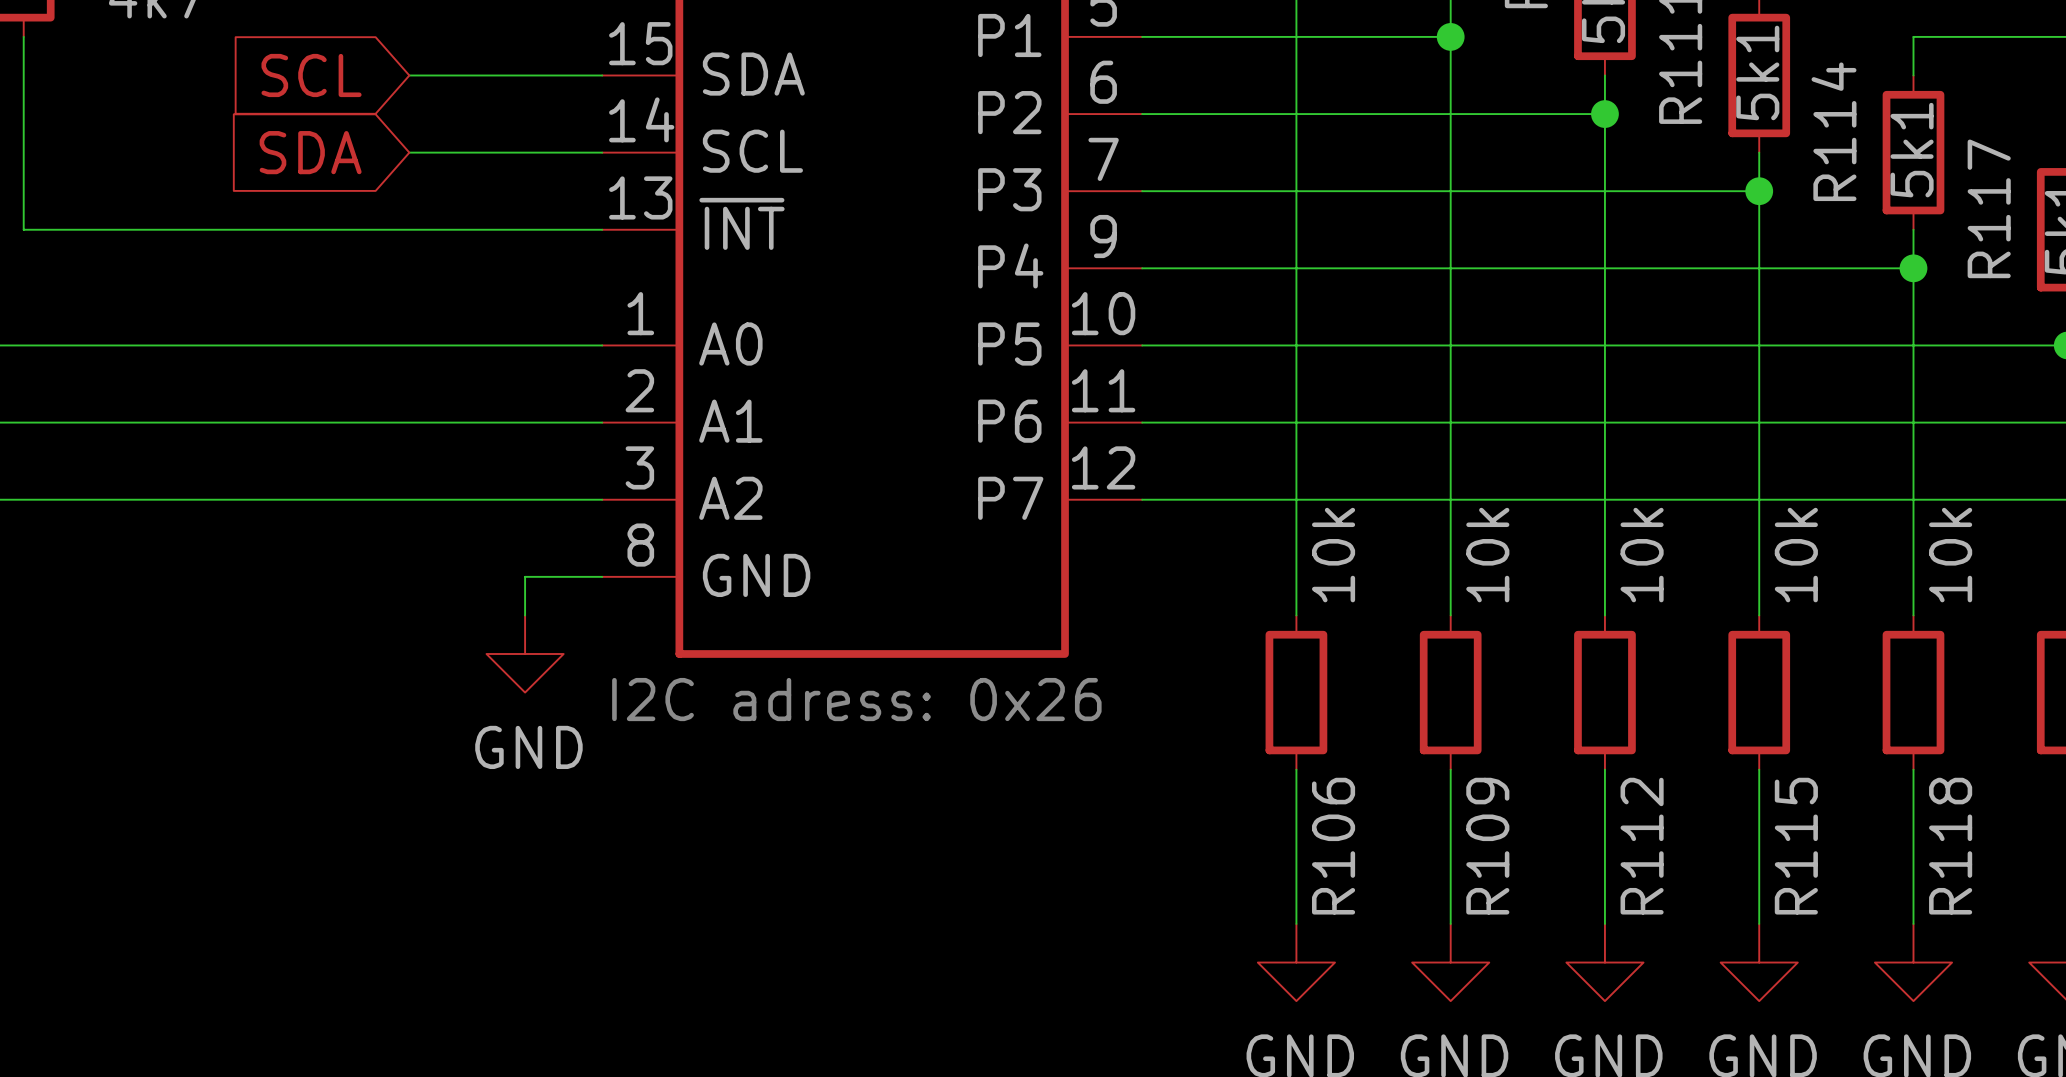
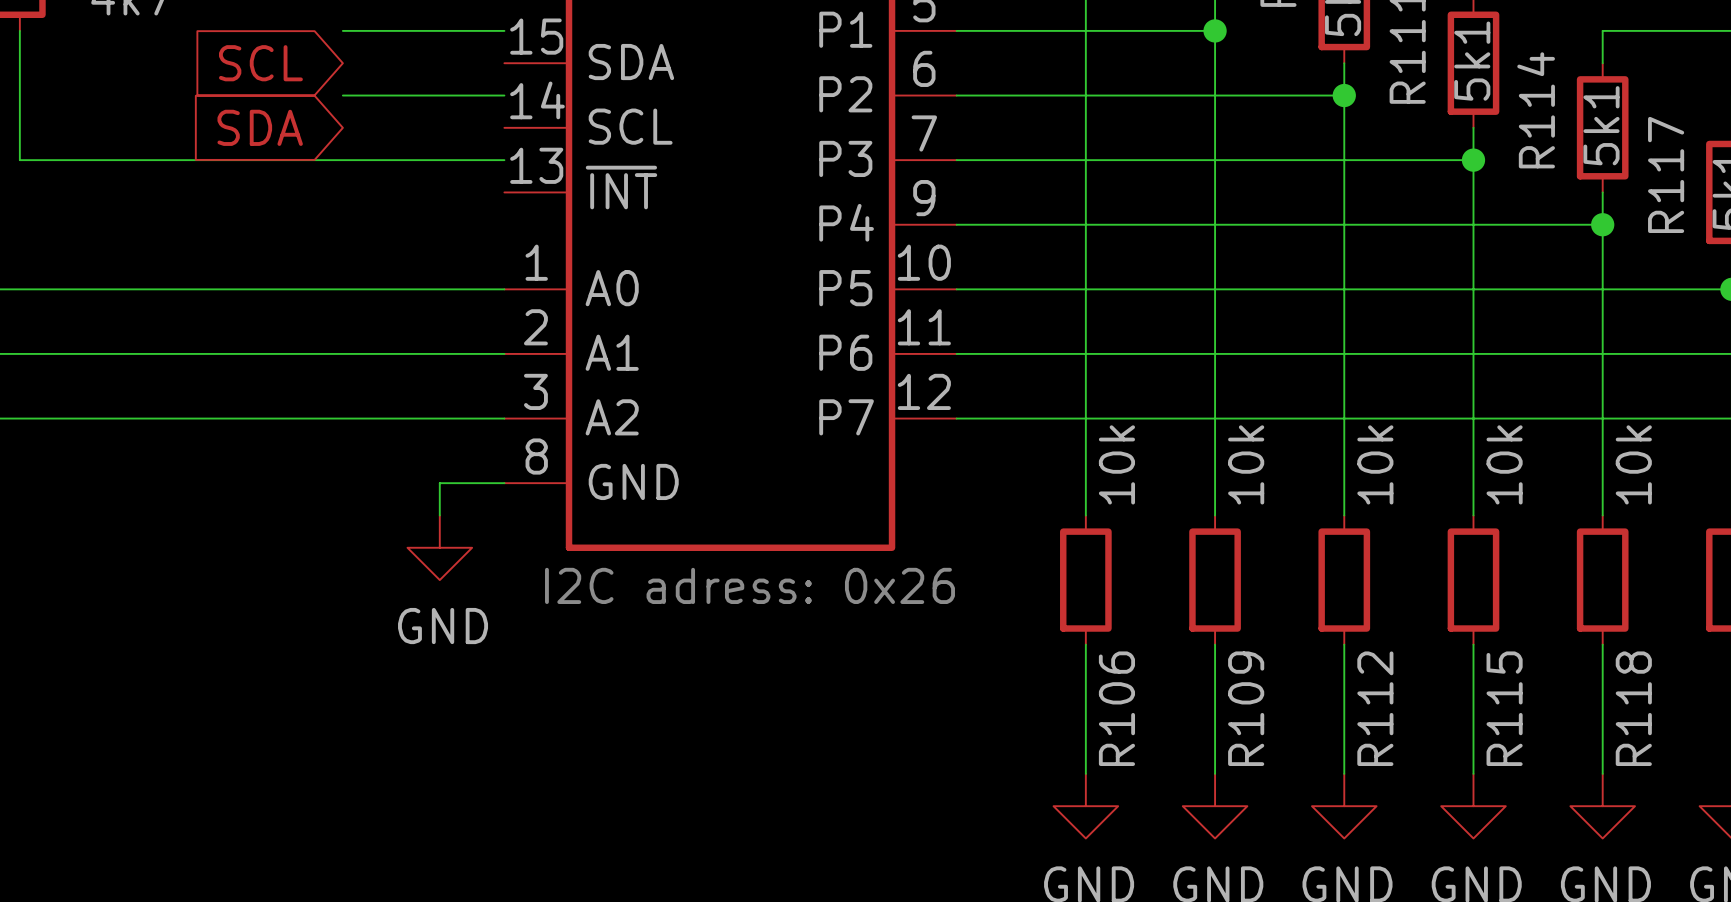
wire: (409, 75) (602, 75) -> (342, 30) (504, 30)
wire: (409, 152) (602, 152) -> (342, 95) (504, 95)
wire: (23, 191) (23, 229) (602, 229) -> (19, 160) (504, 160)
text position: I2C adress: 0x26 (856, 699) -> I2C adress: 0x26 (749, 585)

